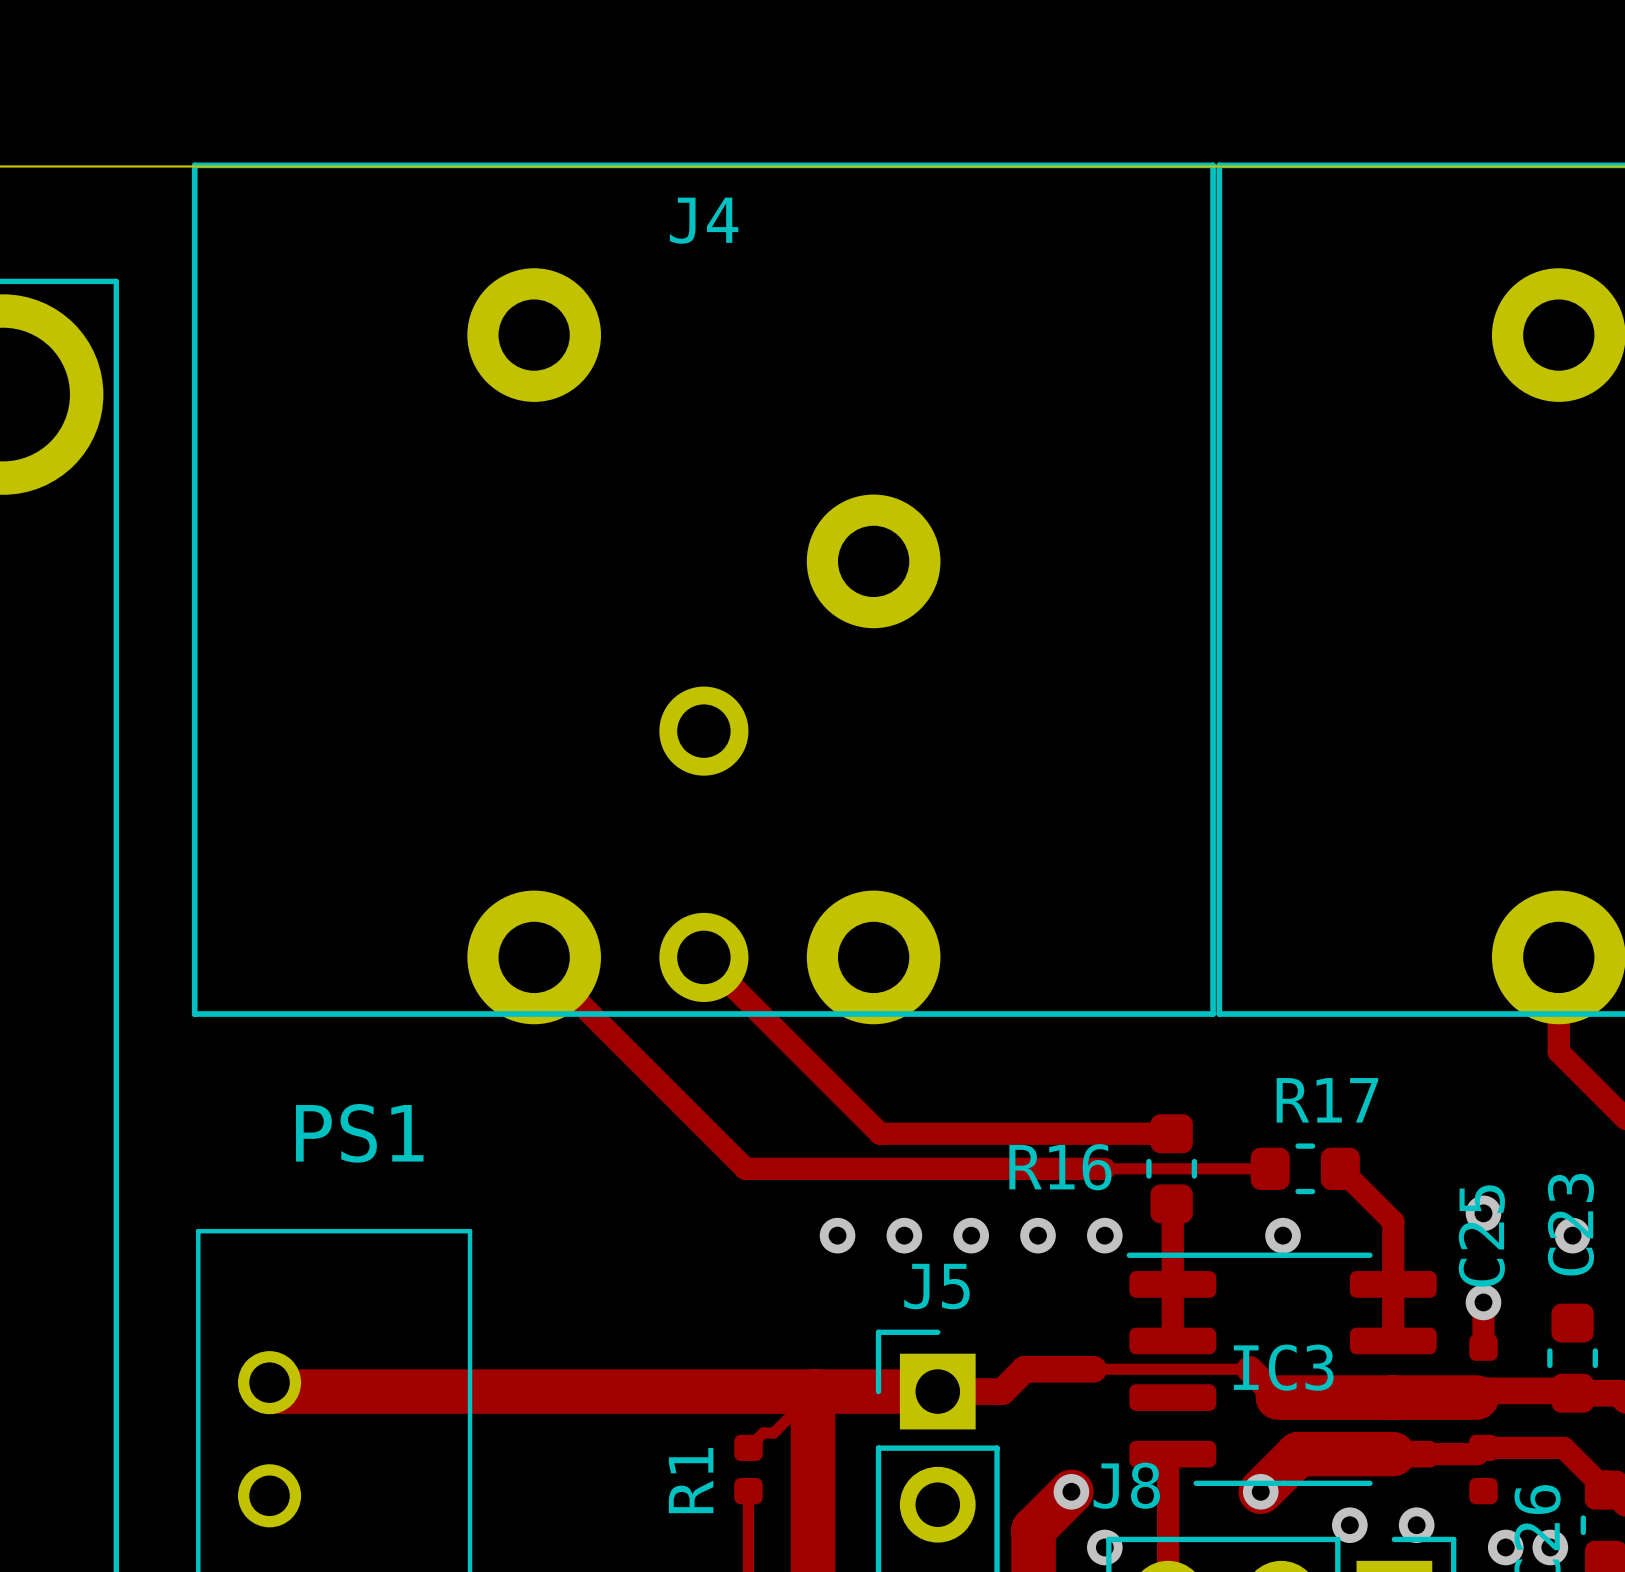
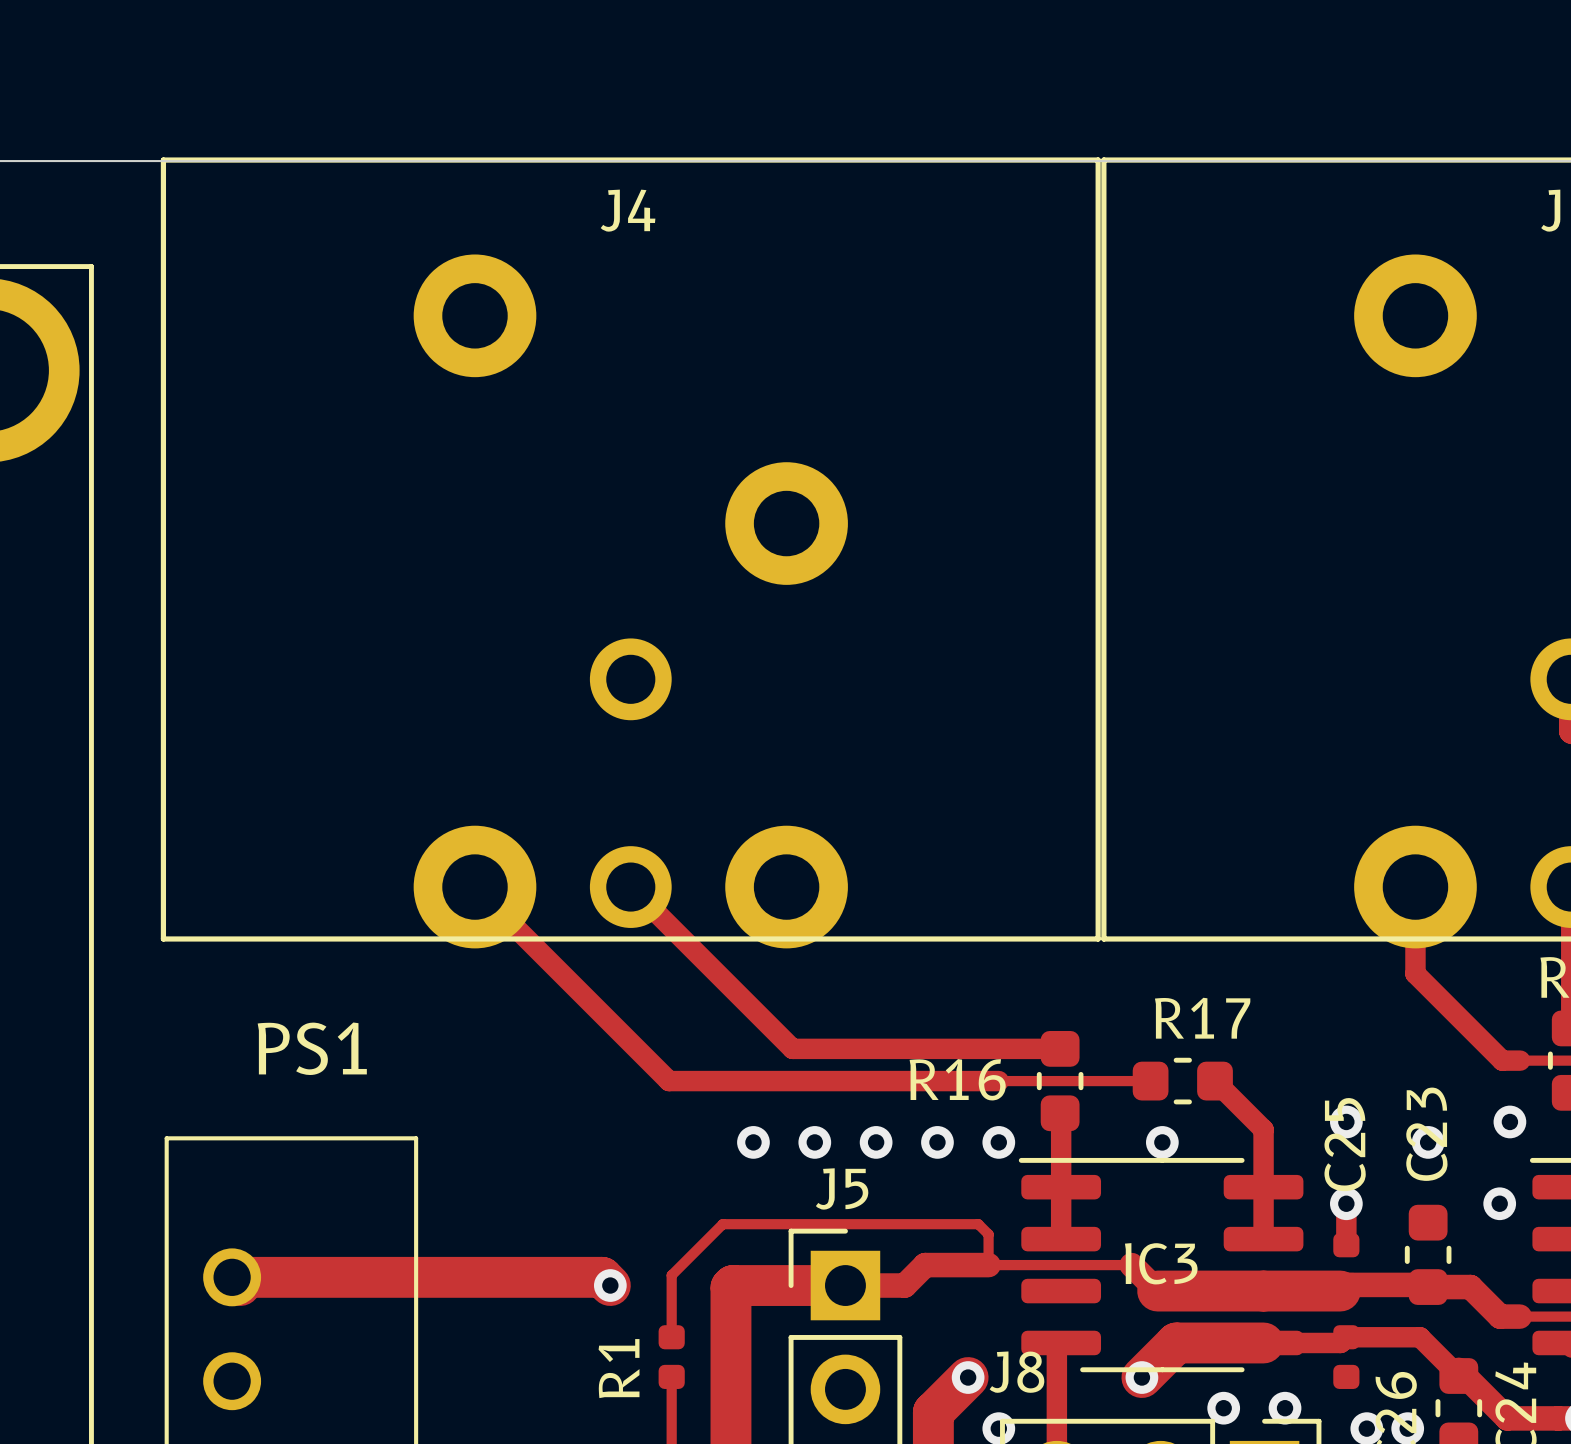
track: none -> (232, 1277) (602, 1277) (610, 1285)
track: (278, 1391) (815, 1391) (773, 1433) (763, 1433) (748, 1447) -> (988, 1265) (988, 1234) (978, 1224) (722, 1224) (671, 1275) (671, 1337)
via: none -> (610, 1285)

